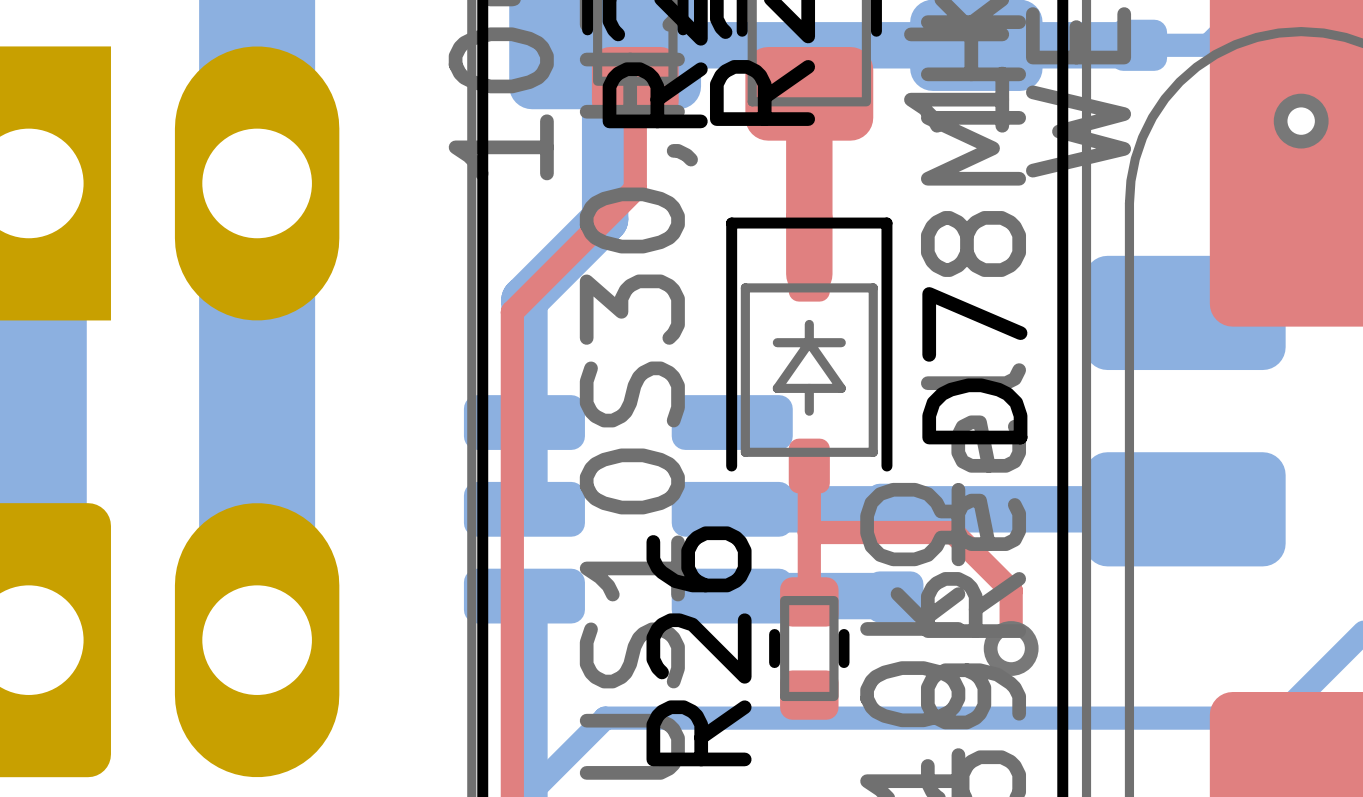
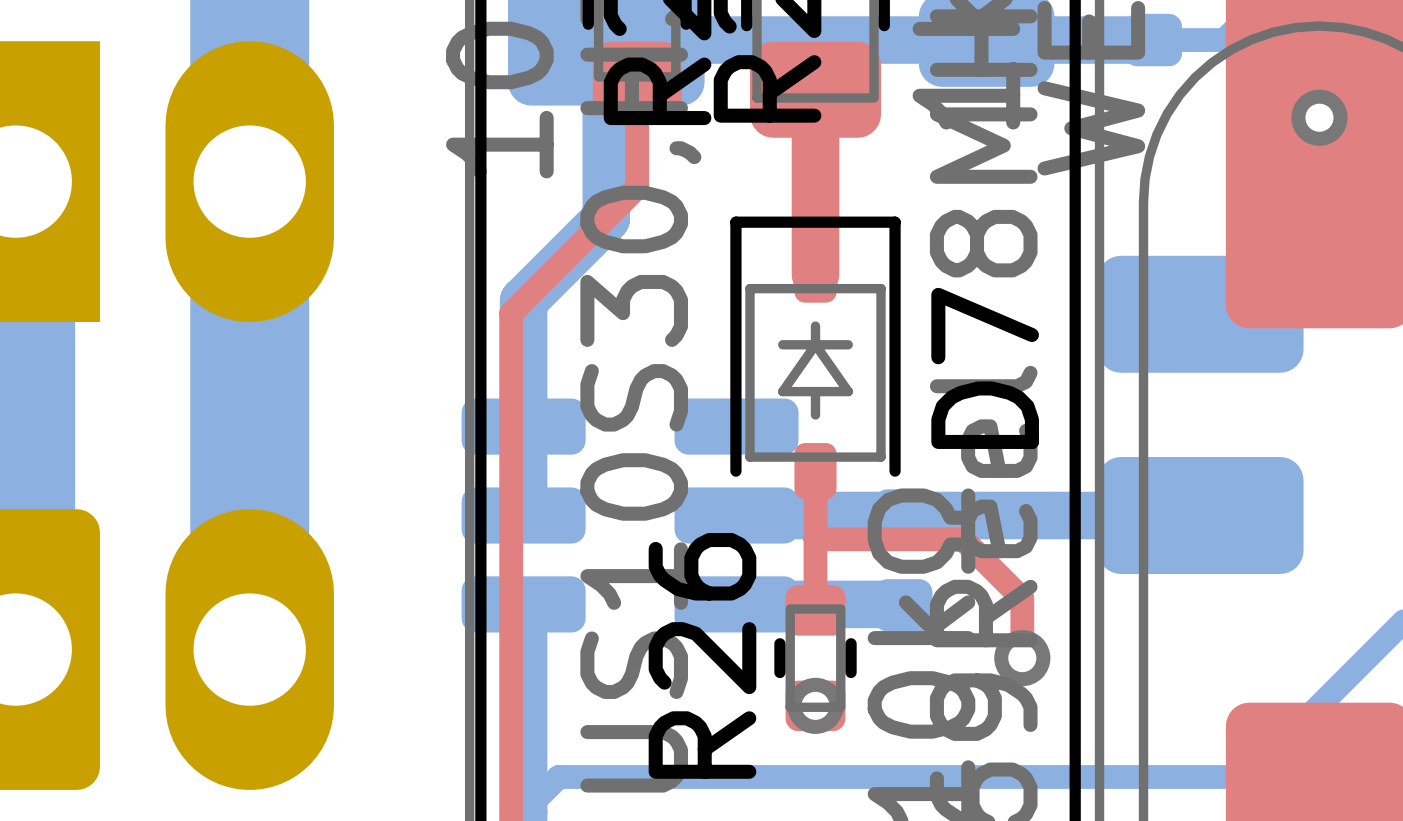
via: none -> (815, 705)
bottom track: (1277, 718) (605, 718) (558, 764) -> (1295, 729) (1248, 776) (558, 776)

